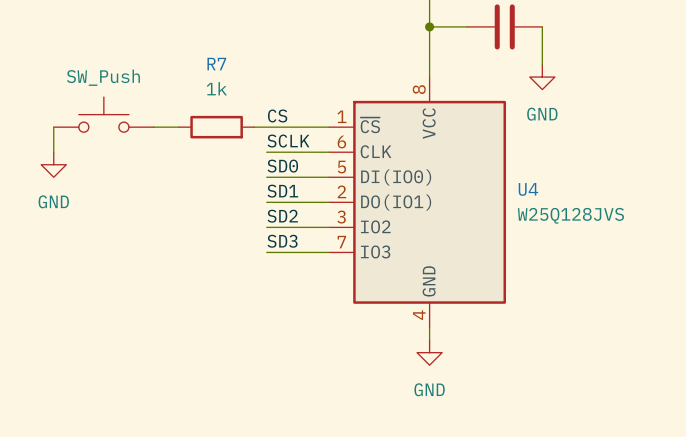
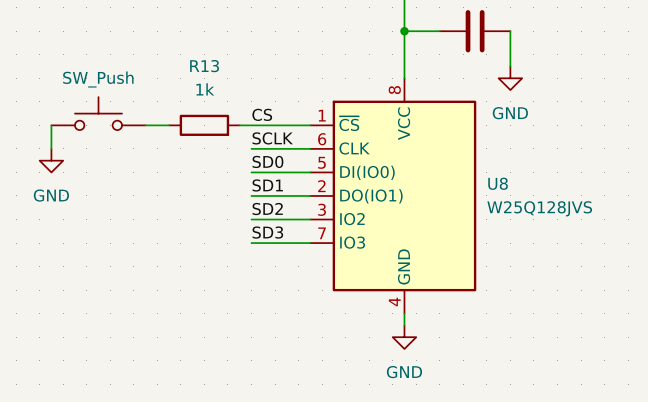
R7 name: R7 (216, 64) -> R13 (204, 66)
U4 name: U4 (528, 189) -> U8 (498, 183)

